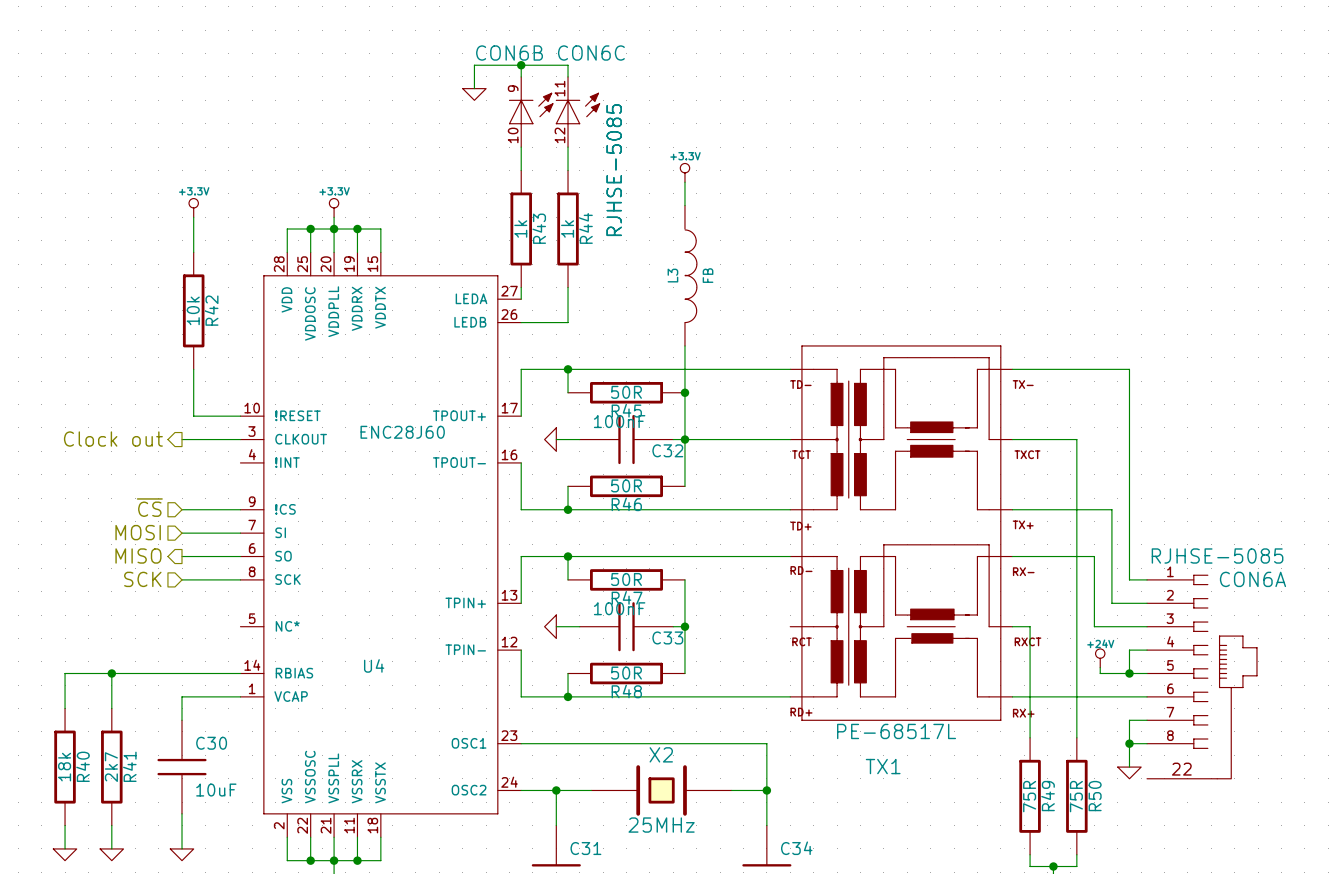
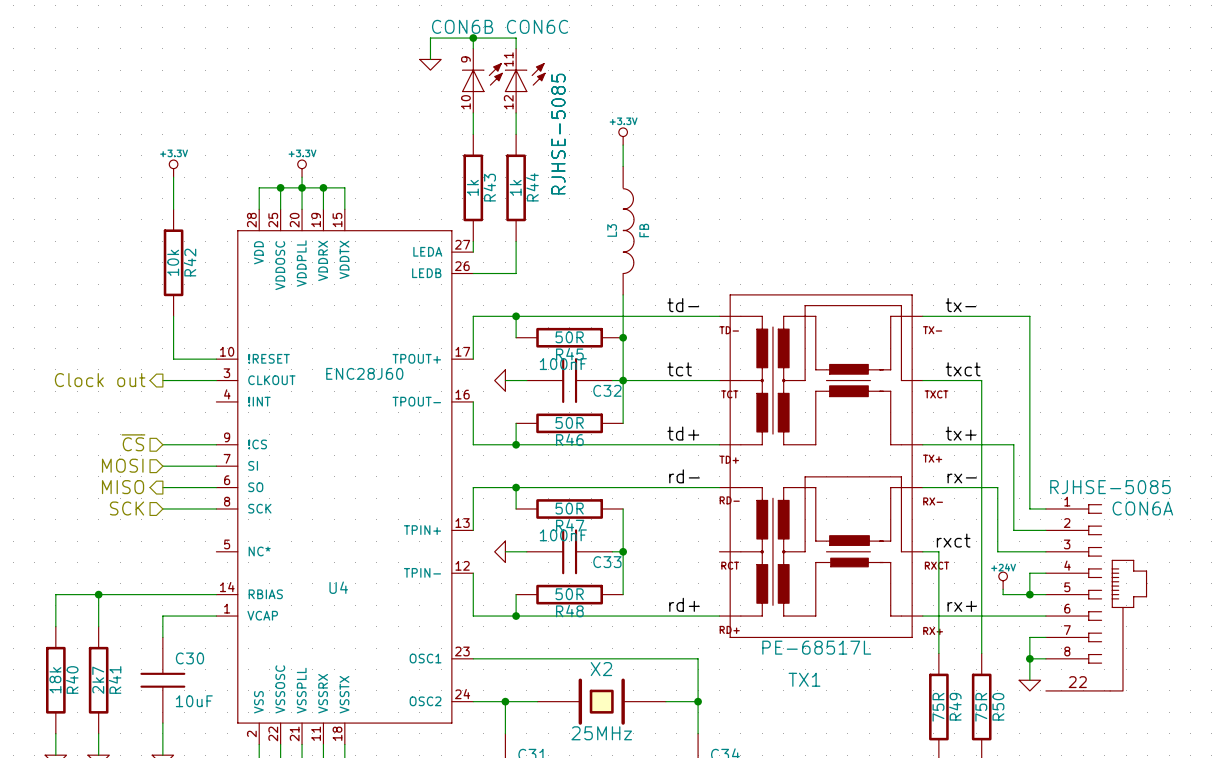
label: none -> td- (683, 305)
label: none -> tx- (960, 305)
label: none -> tct (679, 369)
label: none -> txct (963, 369)
label: none -> td+ (683, 433)
label: none -> tx+ (960, 433)
label: none -> rd- (684, 476)
label: none -> rx- (962, 478)
label: none -> rxct (953, 540)
label: none -> rd+ (684, 604)
label: none -> rx+ (962, 606)

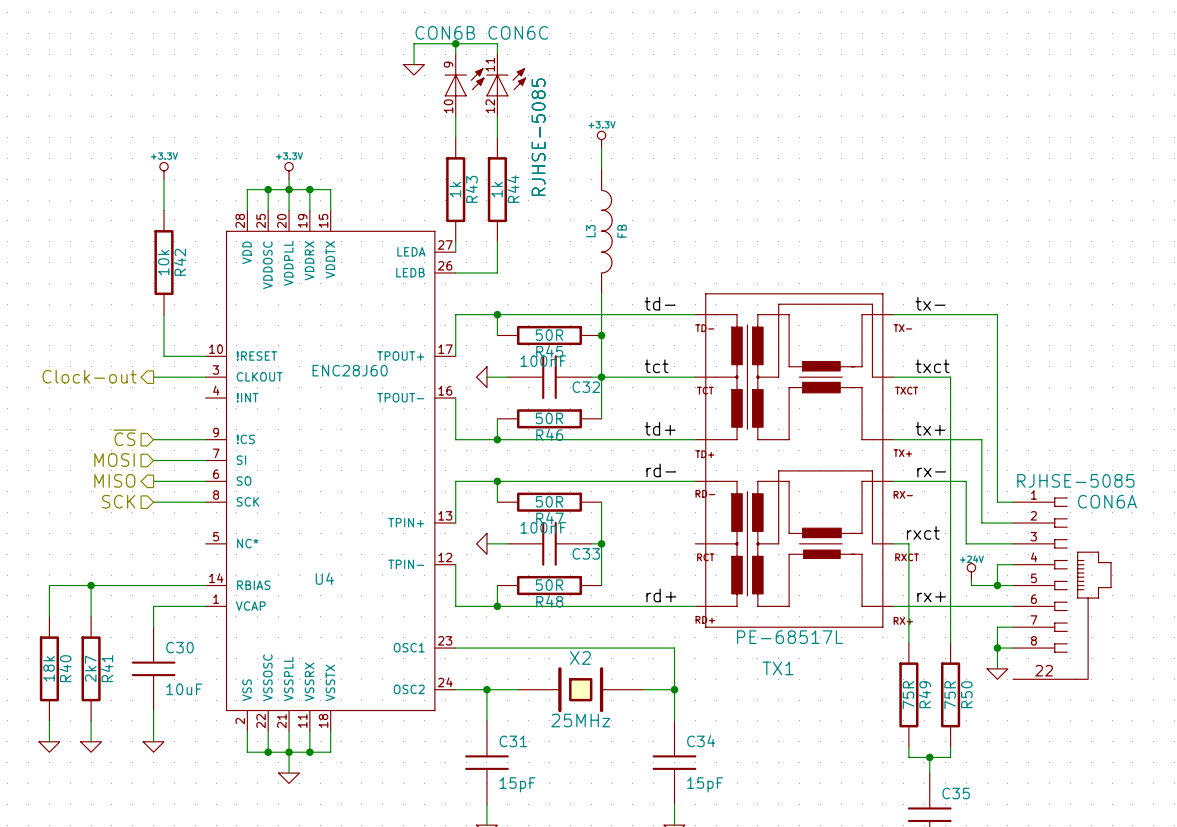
hierarchical label: Clock out (100, 380) -> Clock-out (89, 376)

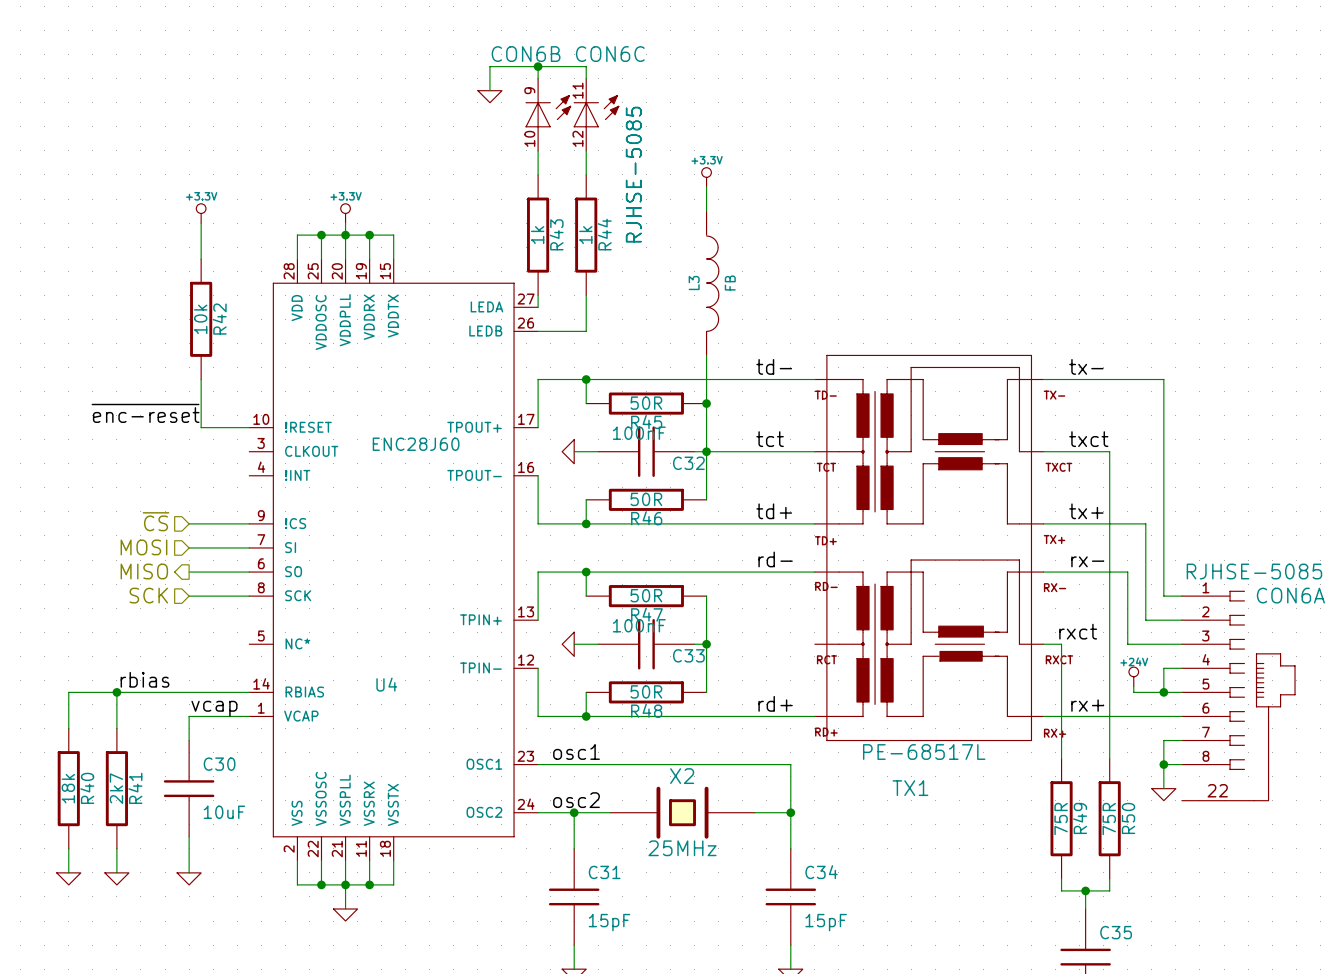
label: none -> ~{enc-reset} (145, 413)
hierarchical label: Clock-out (89, 376) -> none
wire: (153, 377) (205, 377) -> none
label: none -> rbias (145, 679)
label: none -> vcap (214, 708)
label: none -> osc1 (576, 751)
label: none -> osc2 (576, 800)

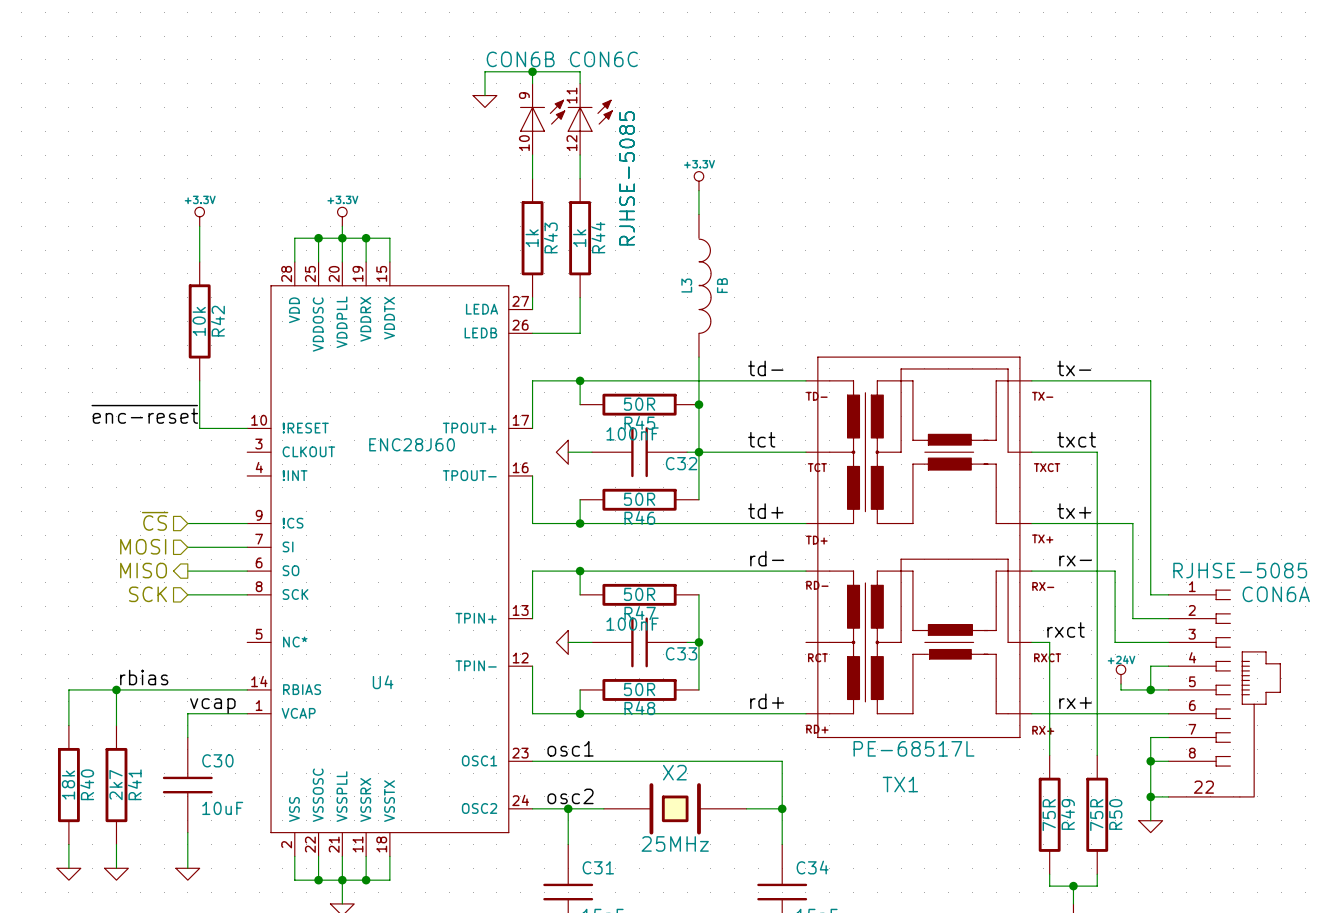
wire: none -> (1150, 785) (1150, 820)
power symbol position: (1163, 794) -> (1150, 826)
wire: none -> (1150, 796) (1168, 796)
junction: none -> (1150, 796)

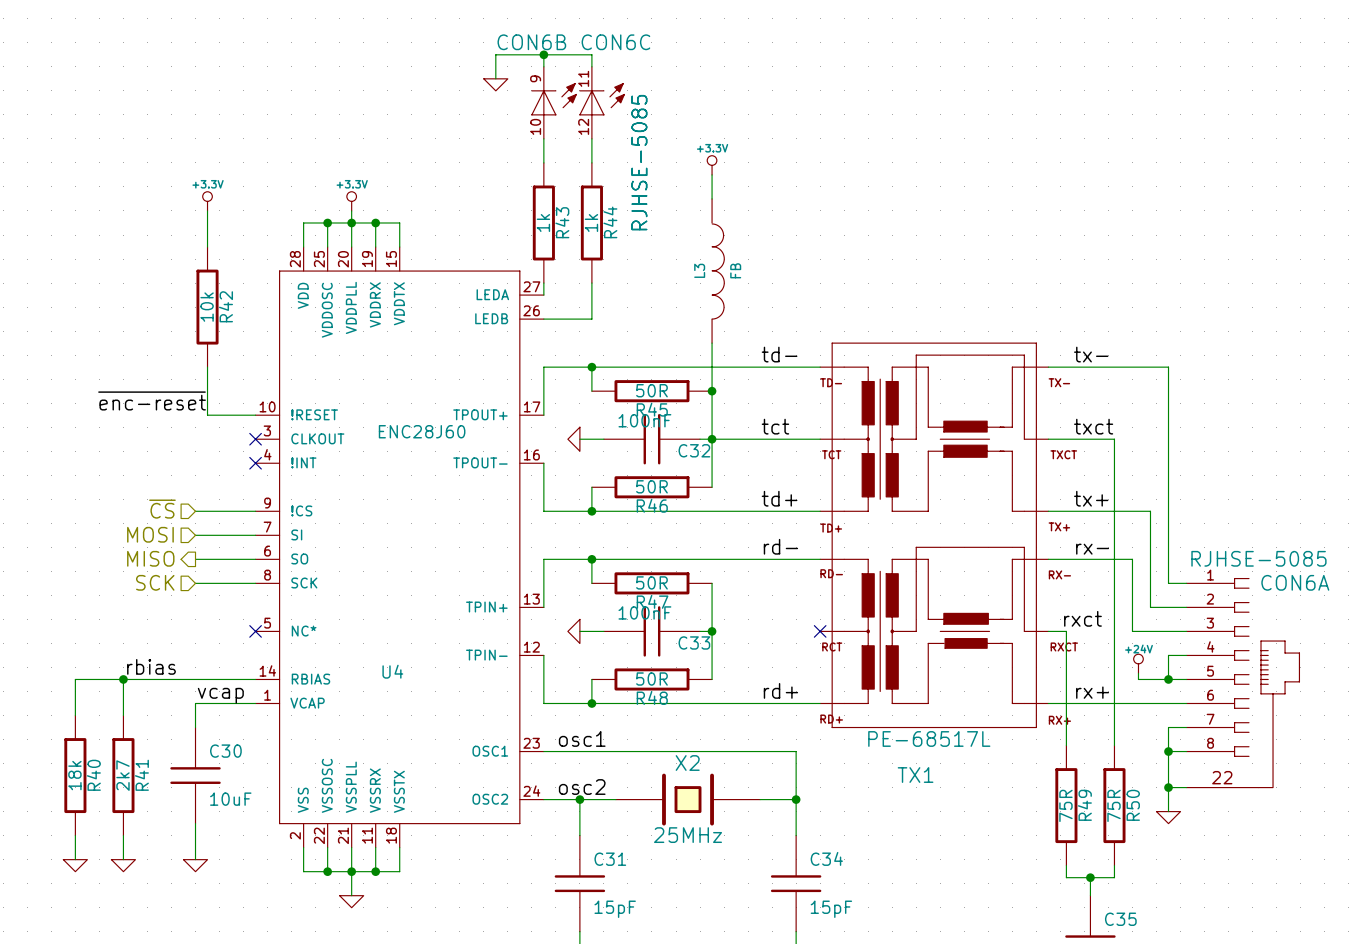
no-connect mark: none -> (255, 439)
no-connect mark: none -> (255, 463)
no-connect mark: none -> (255, 631)
no-connect mark: none -> (820, 631)

